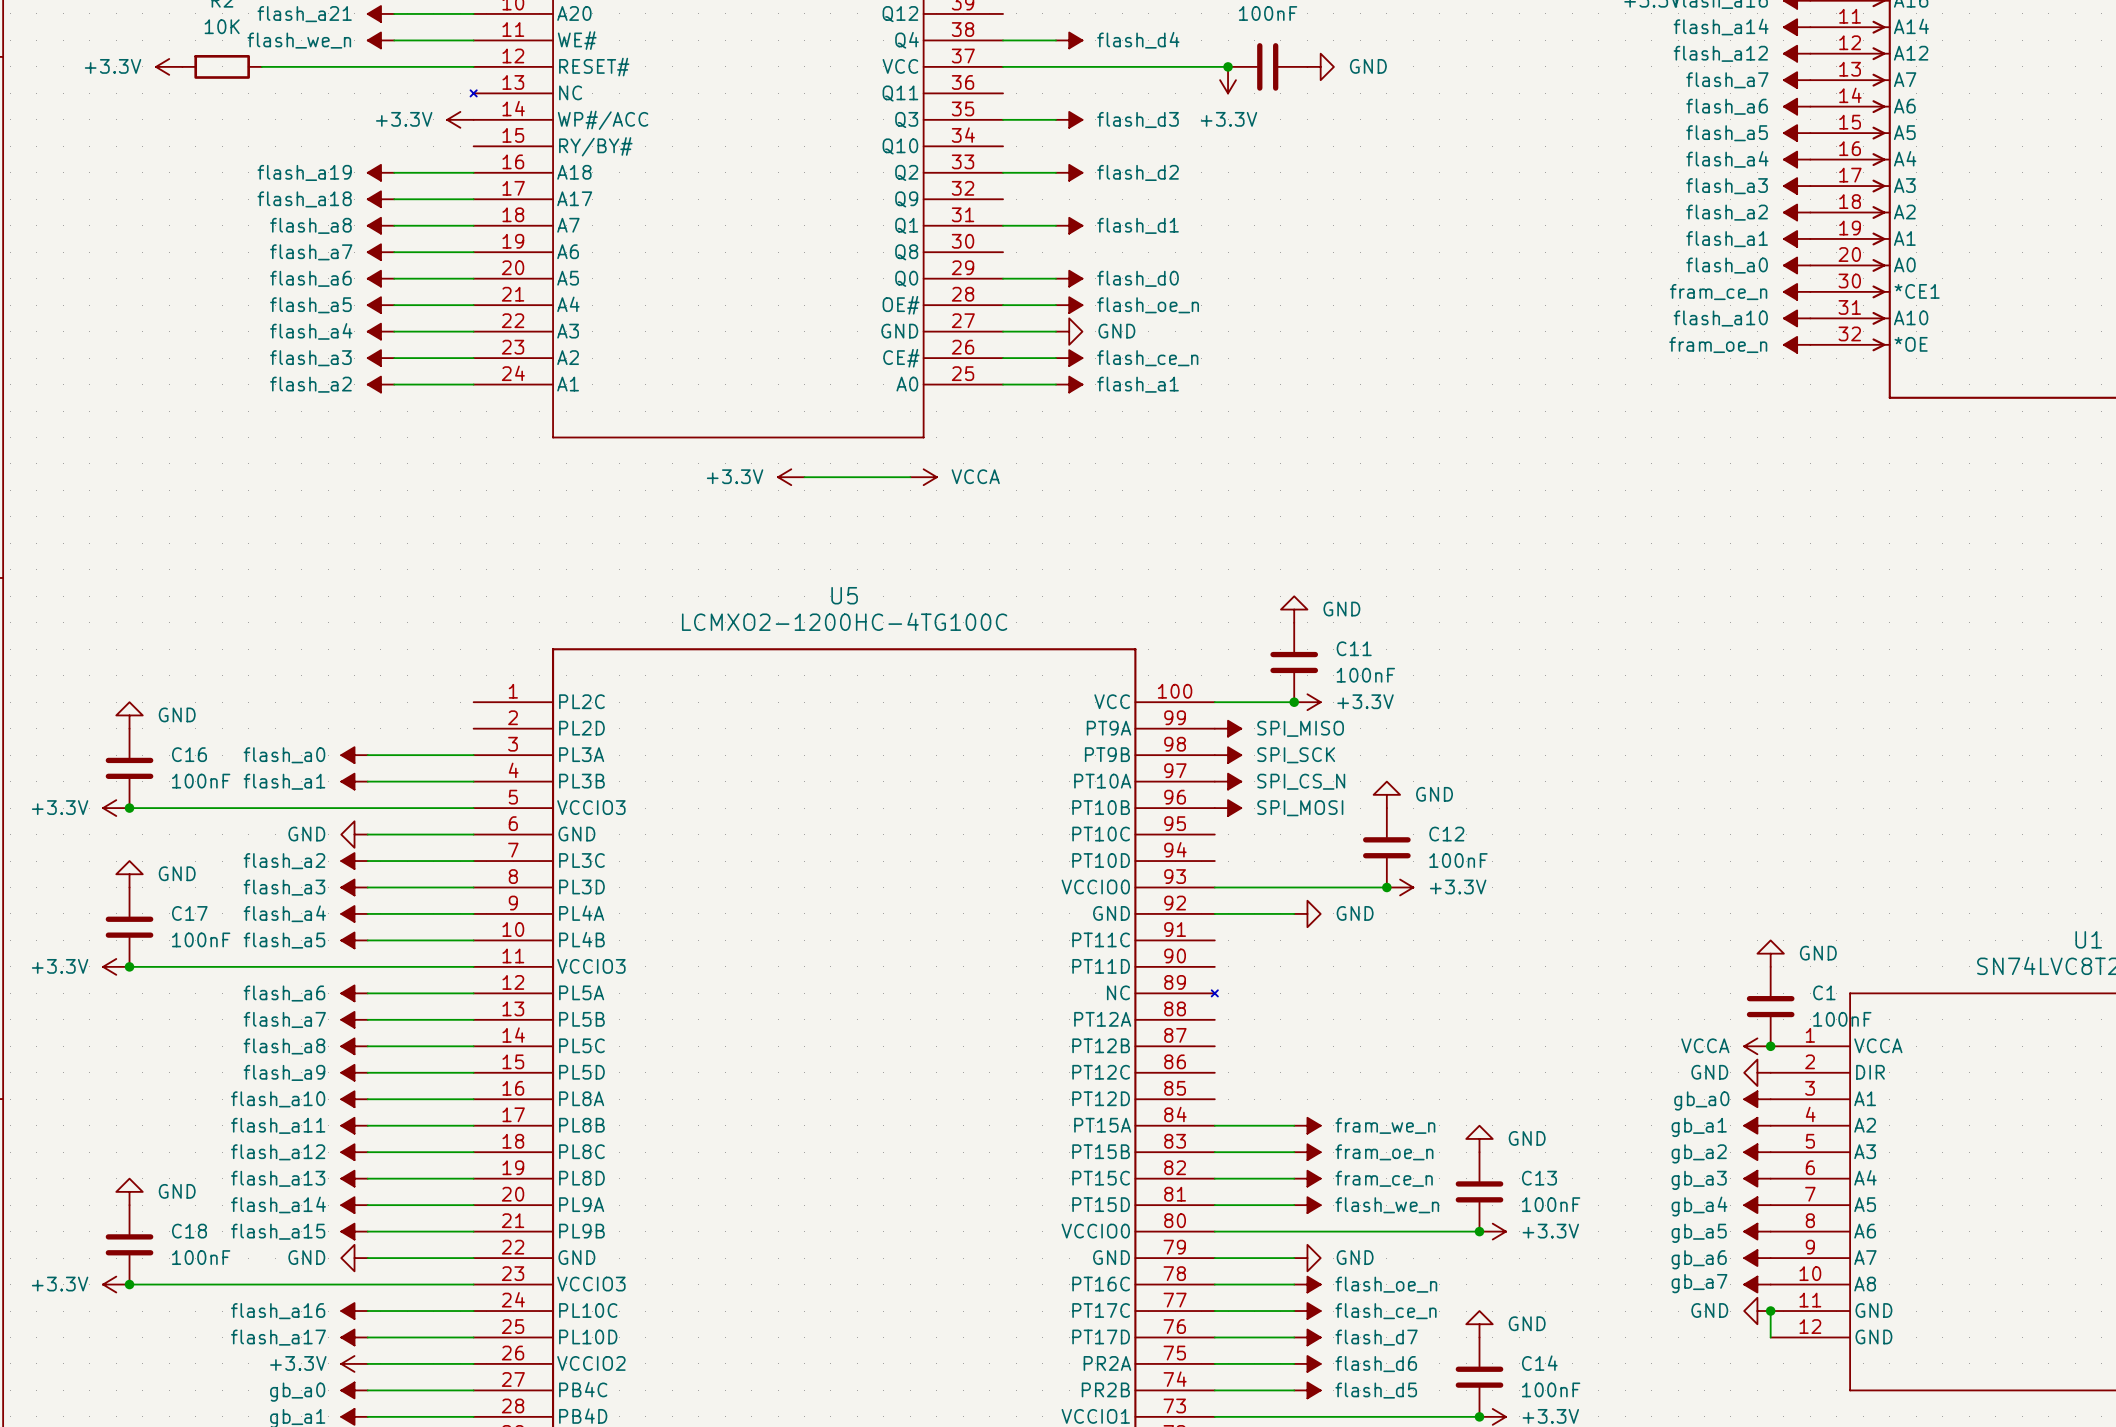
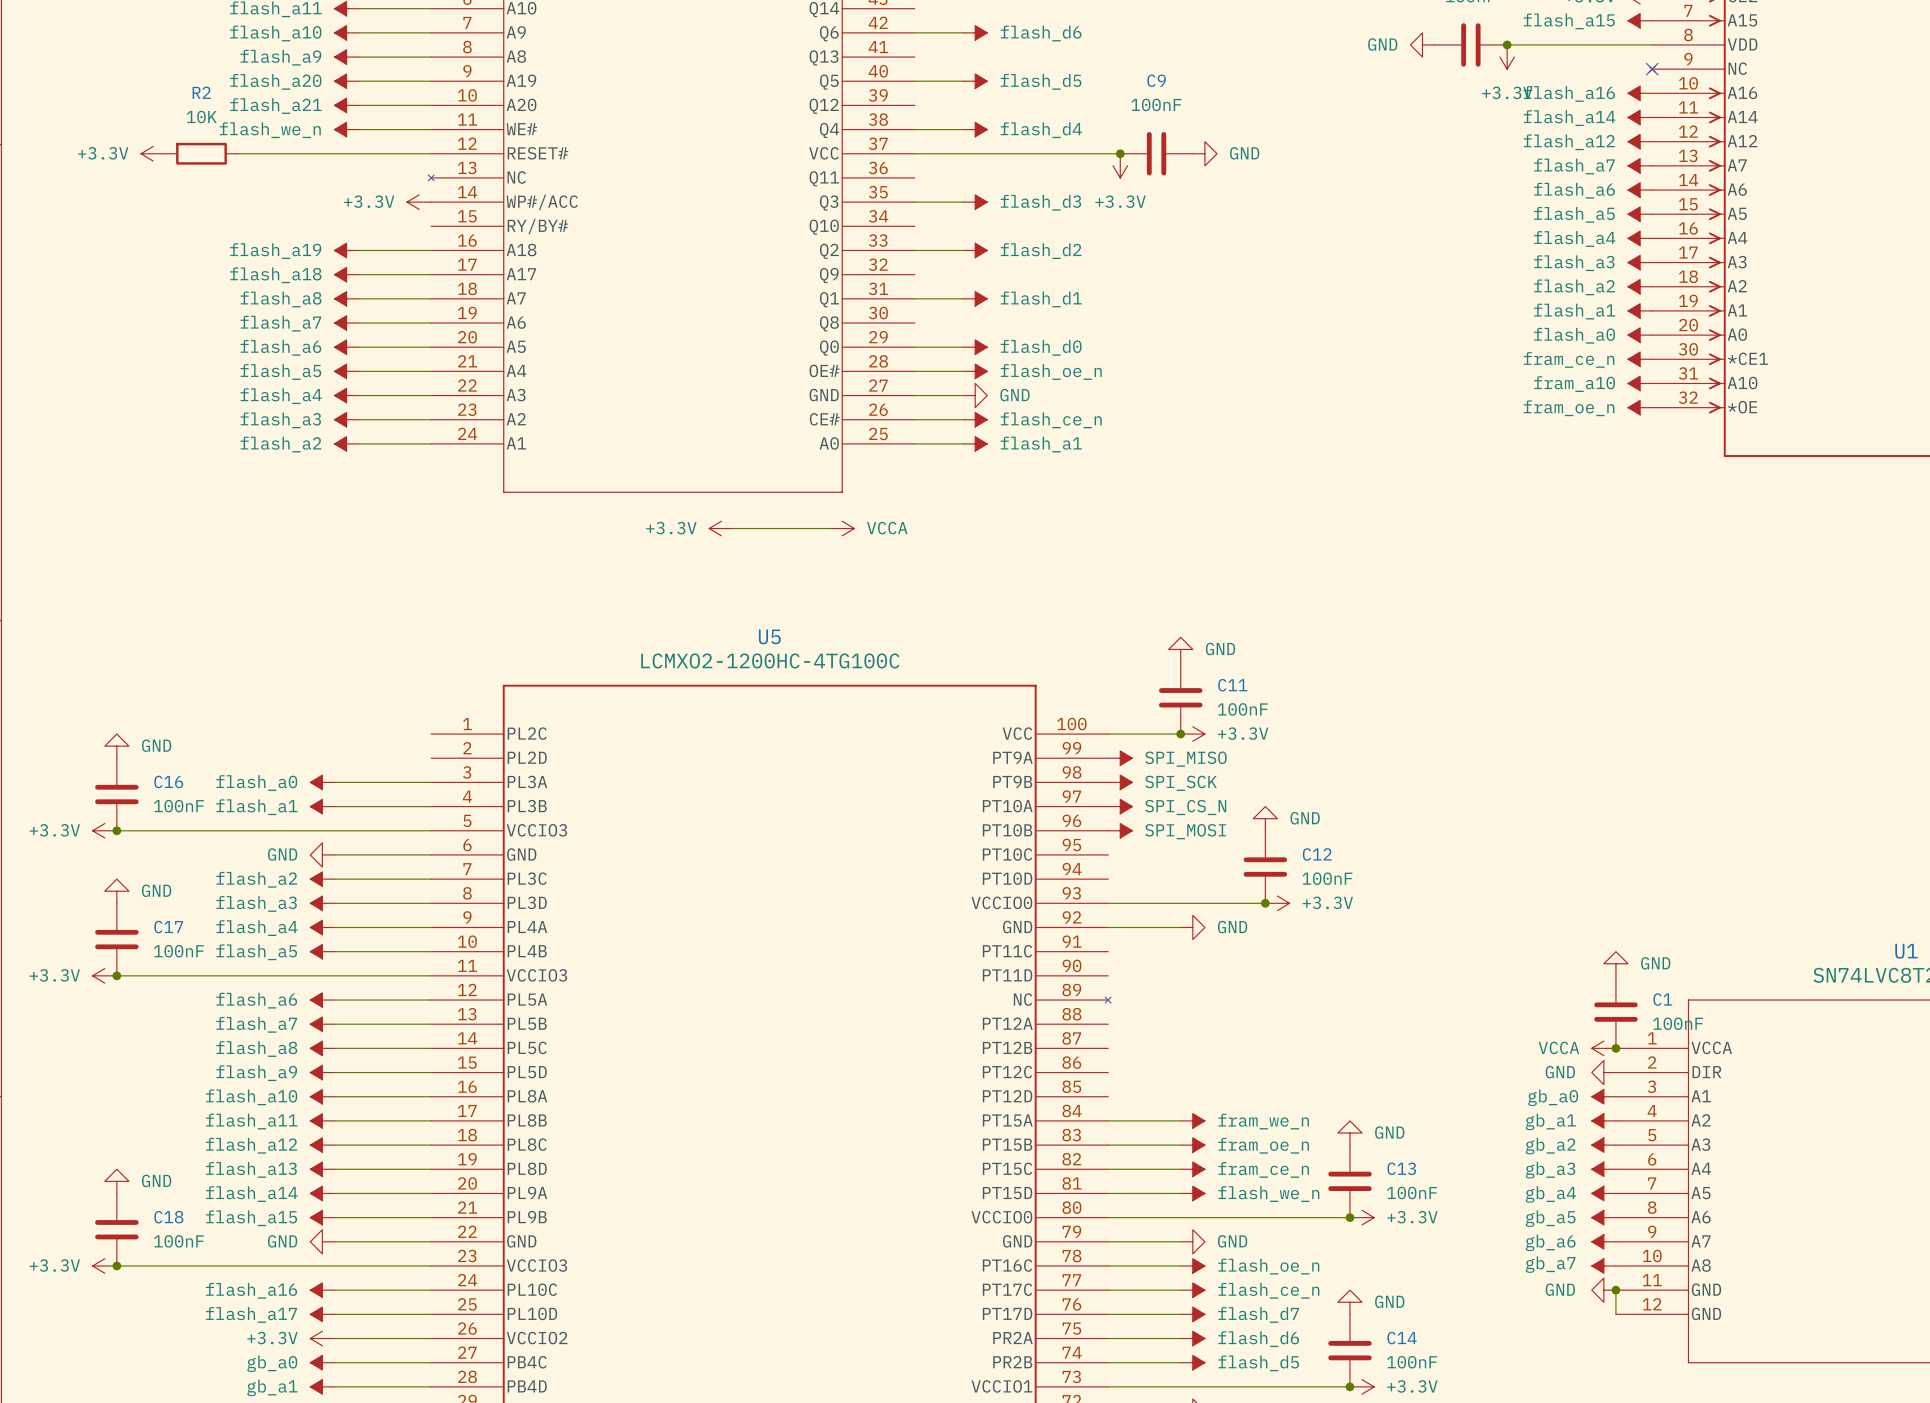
power symbol: flash_a10 (1797, 318) -> fram_a10 (1640, 383)

